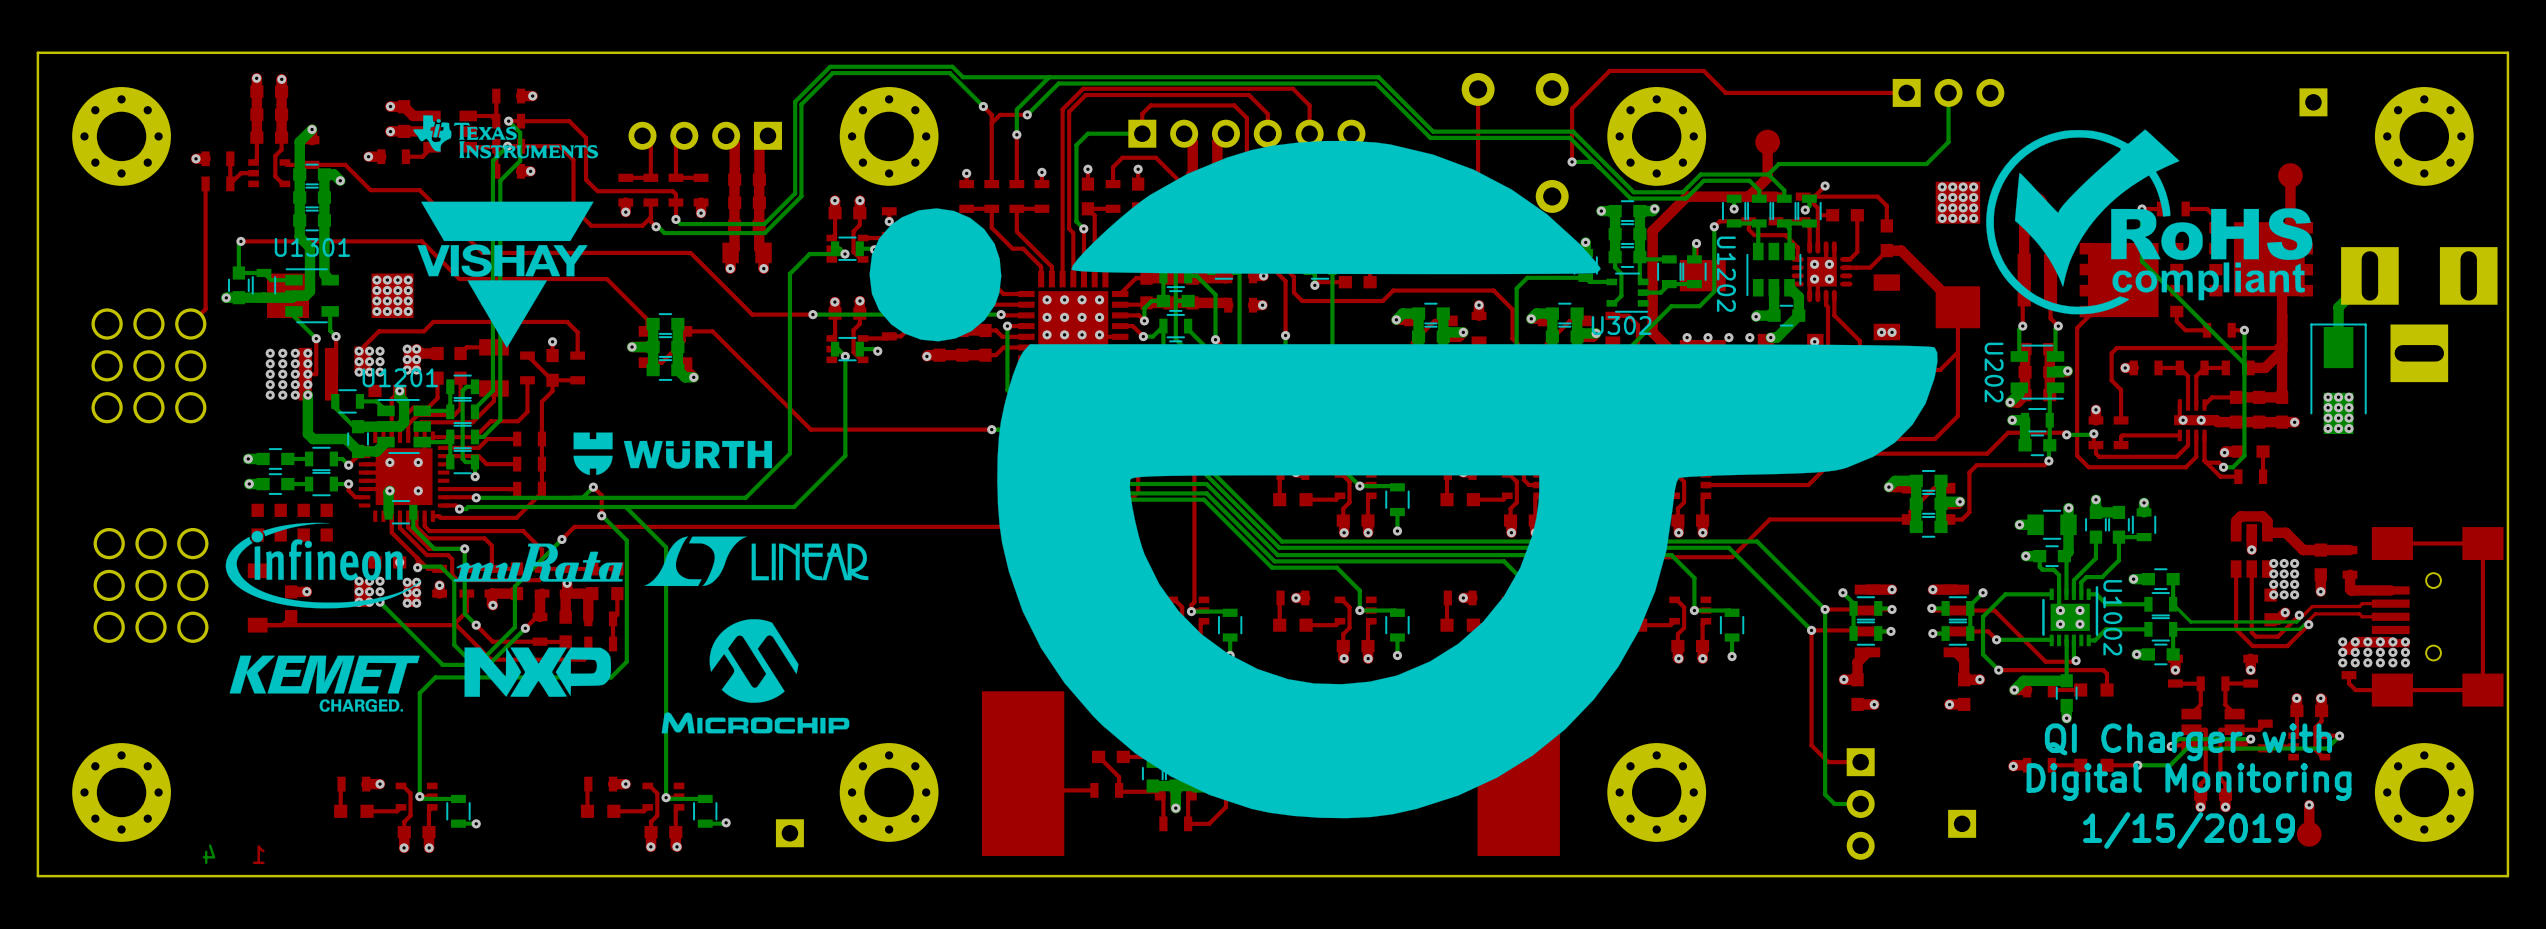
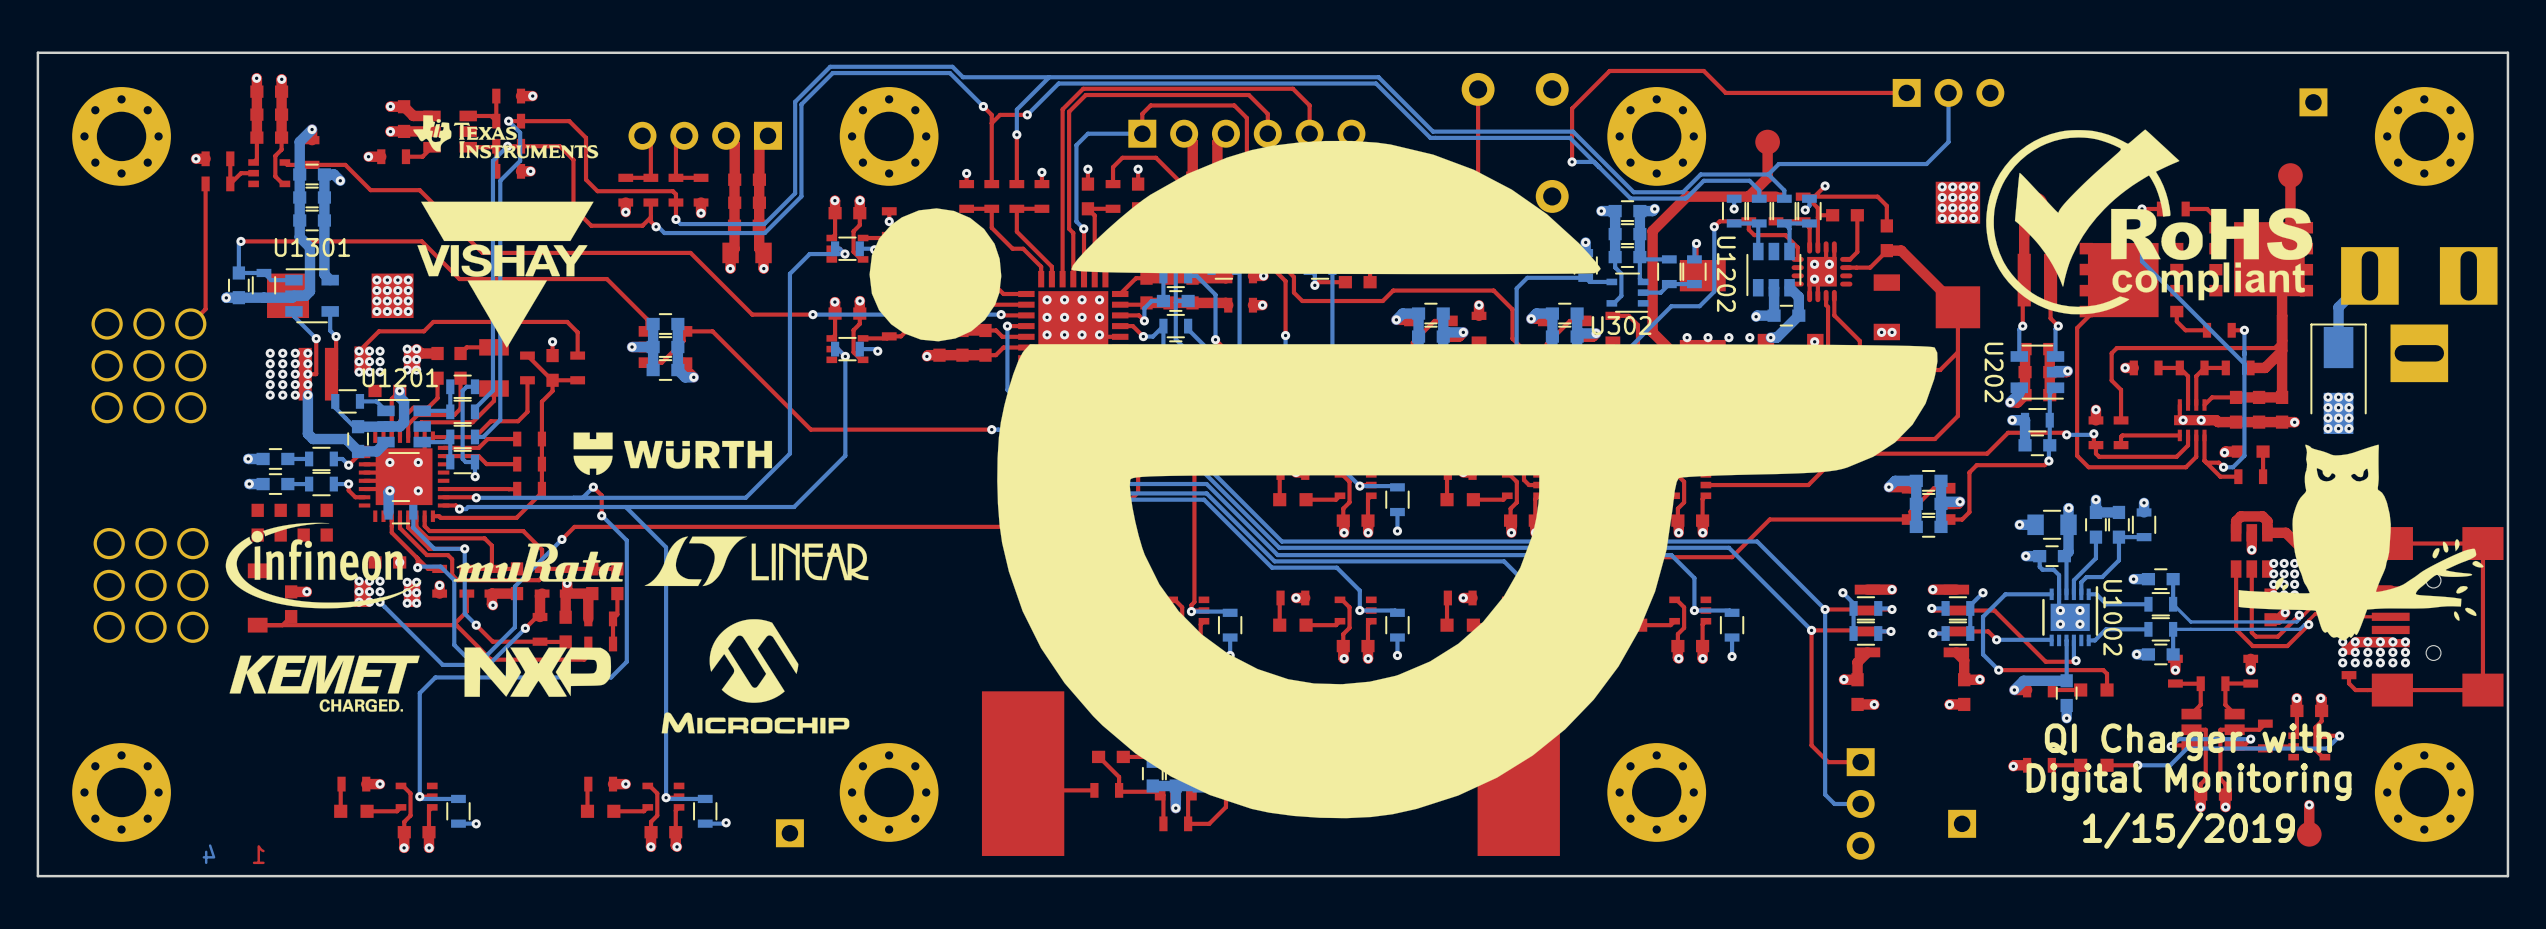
drawing: none -> [2238, 444, 2484, 641]

